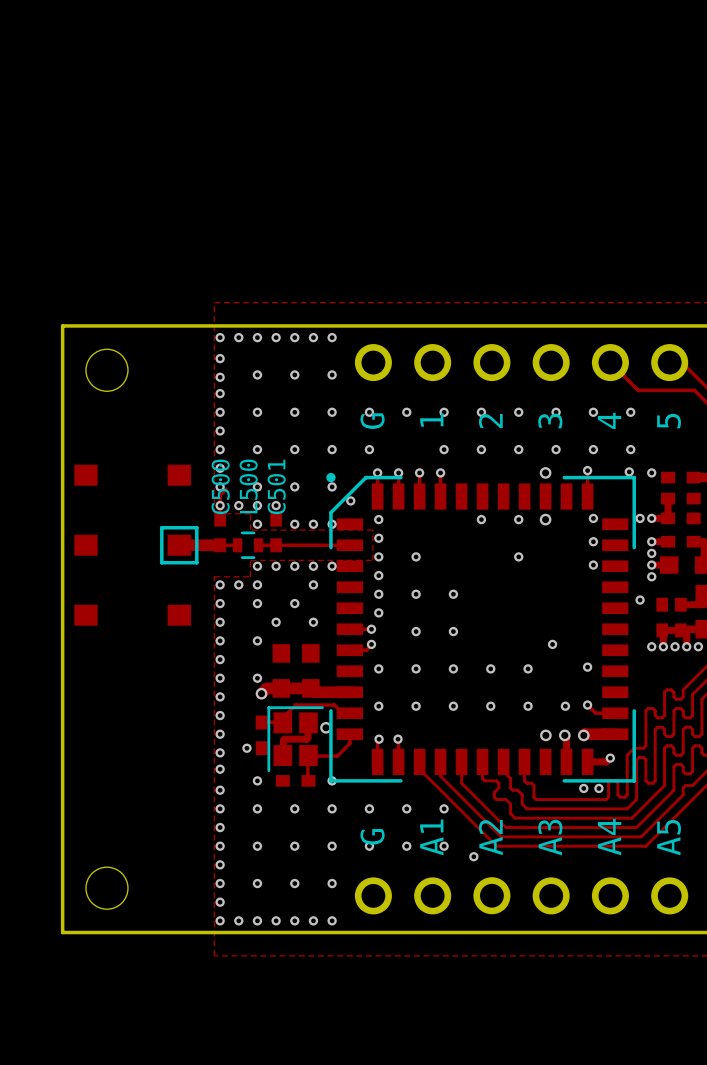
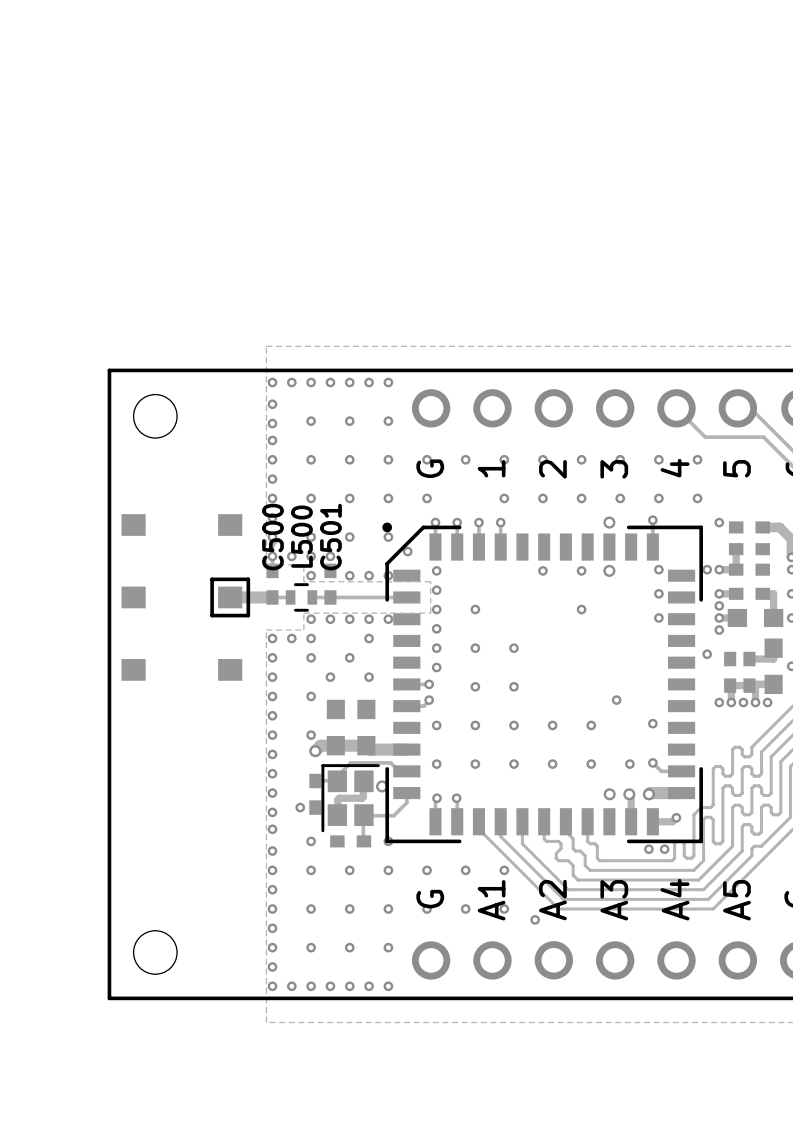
via: (629, 471) -> none

